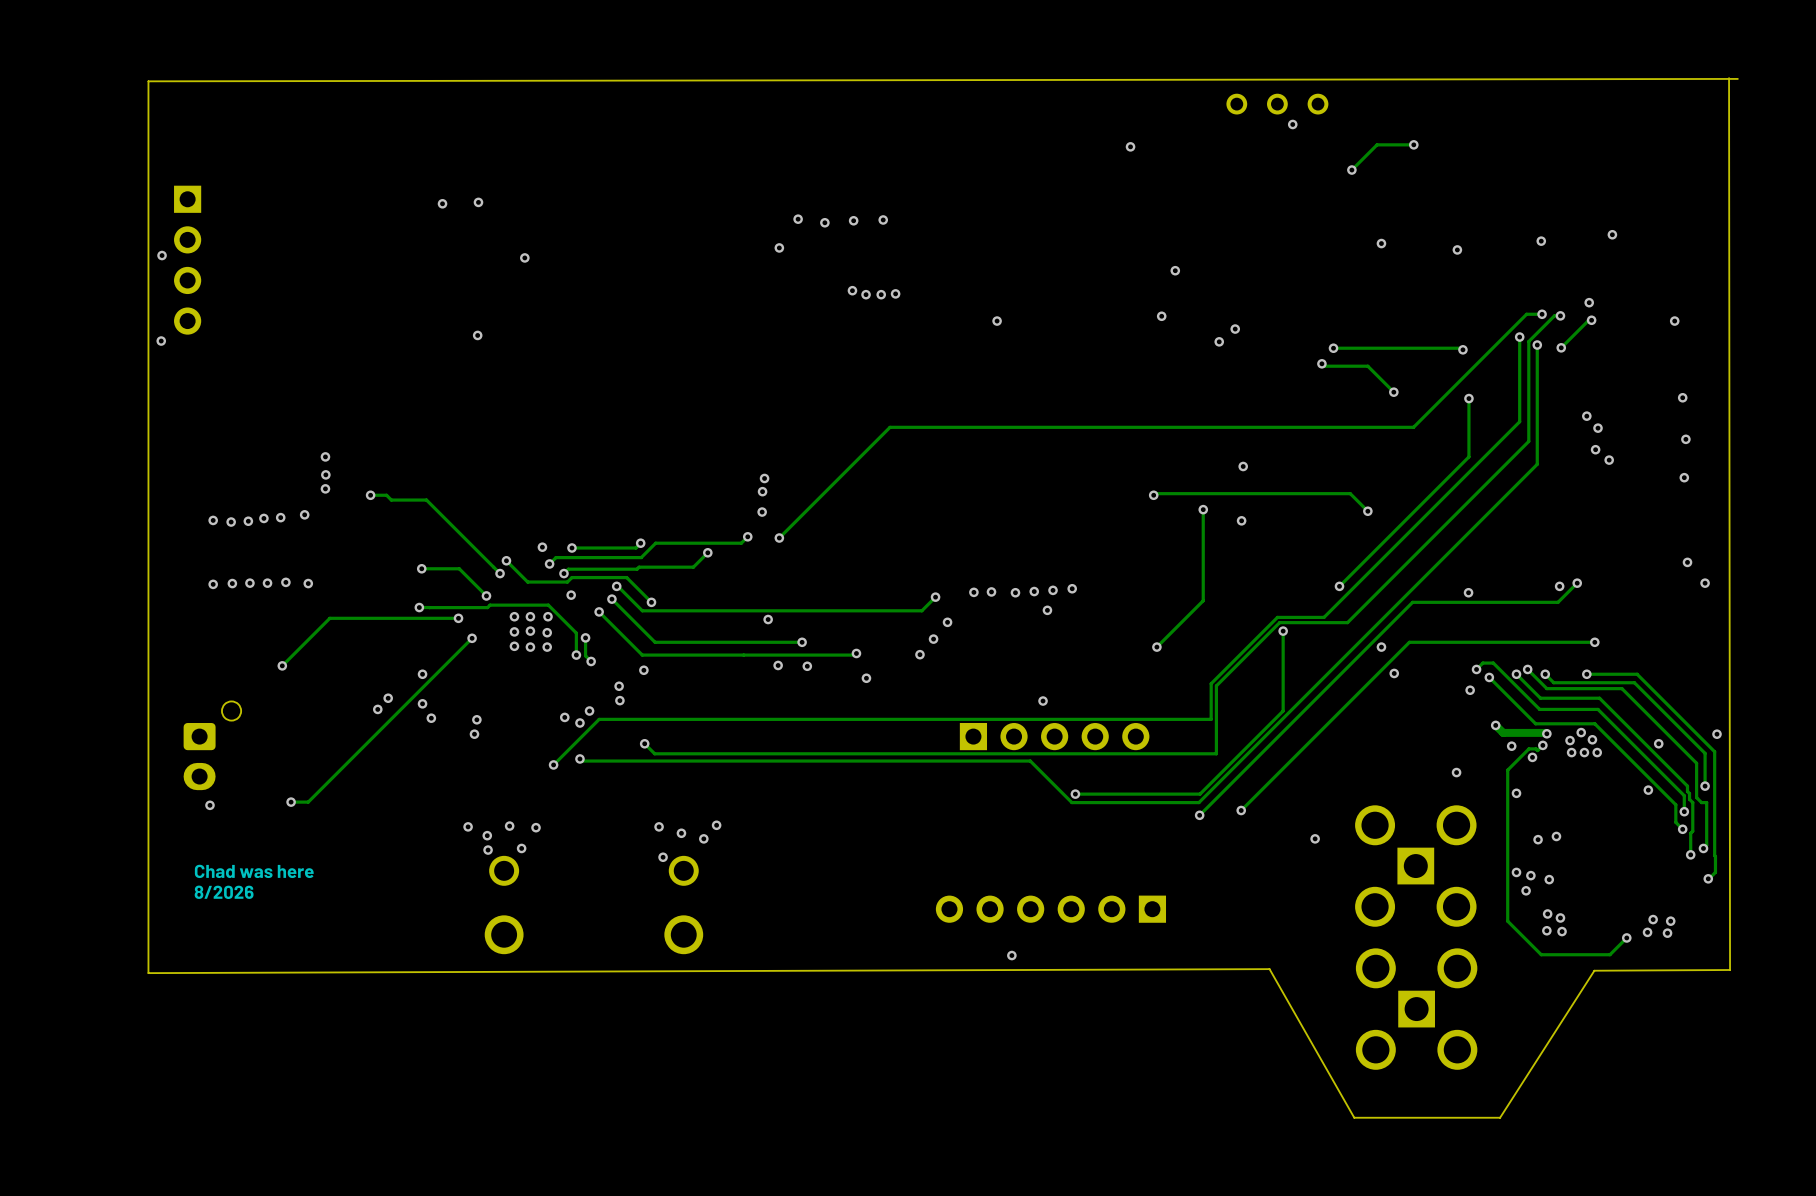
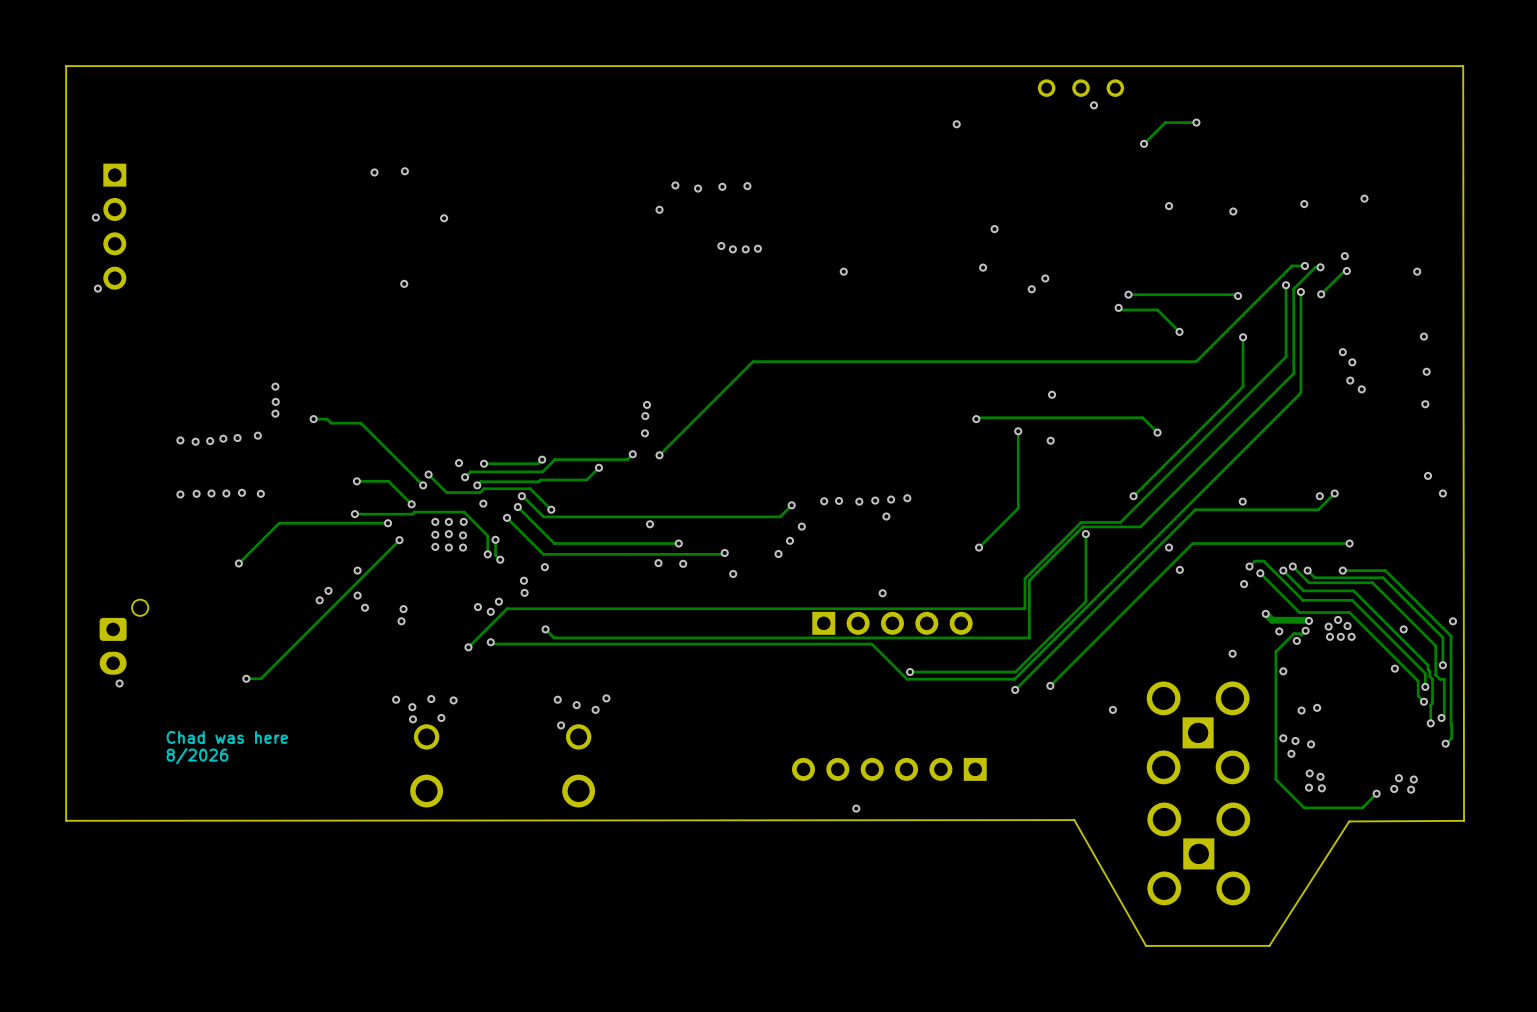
board edge: (1737, 78) (148, 81) (148, 973) (1269, 969) -> (1463, 66) (66, 66) (66, 820) (1074, 820)
via: (162, 255) -> none
via: none -> (95, 217)
part position: (187, 260) -> (114, 226)
via position: (161, 341) -> (97, 288)
part position: (212, 745) -> (123, 637)
via position: (209, 805) -> (119, 683)

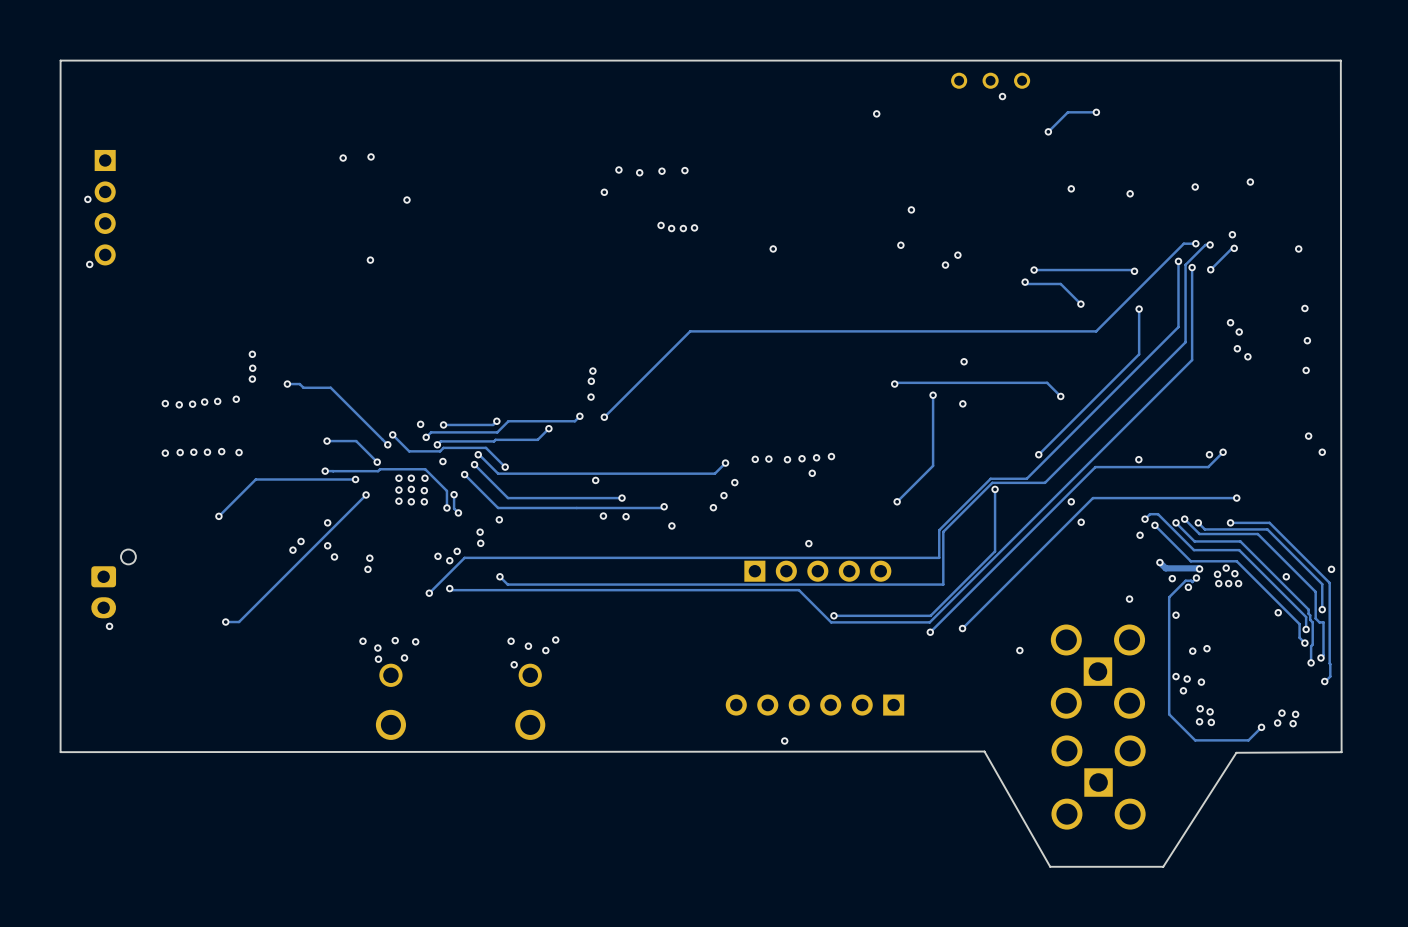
text: Chad was here (227, 737) -> none
text: 8/2026 (197, 756) -> none

